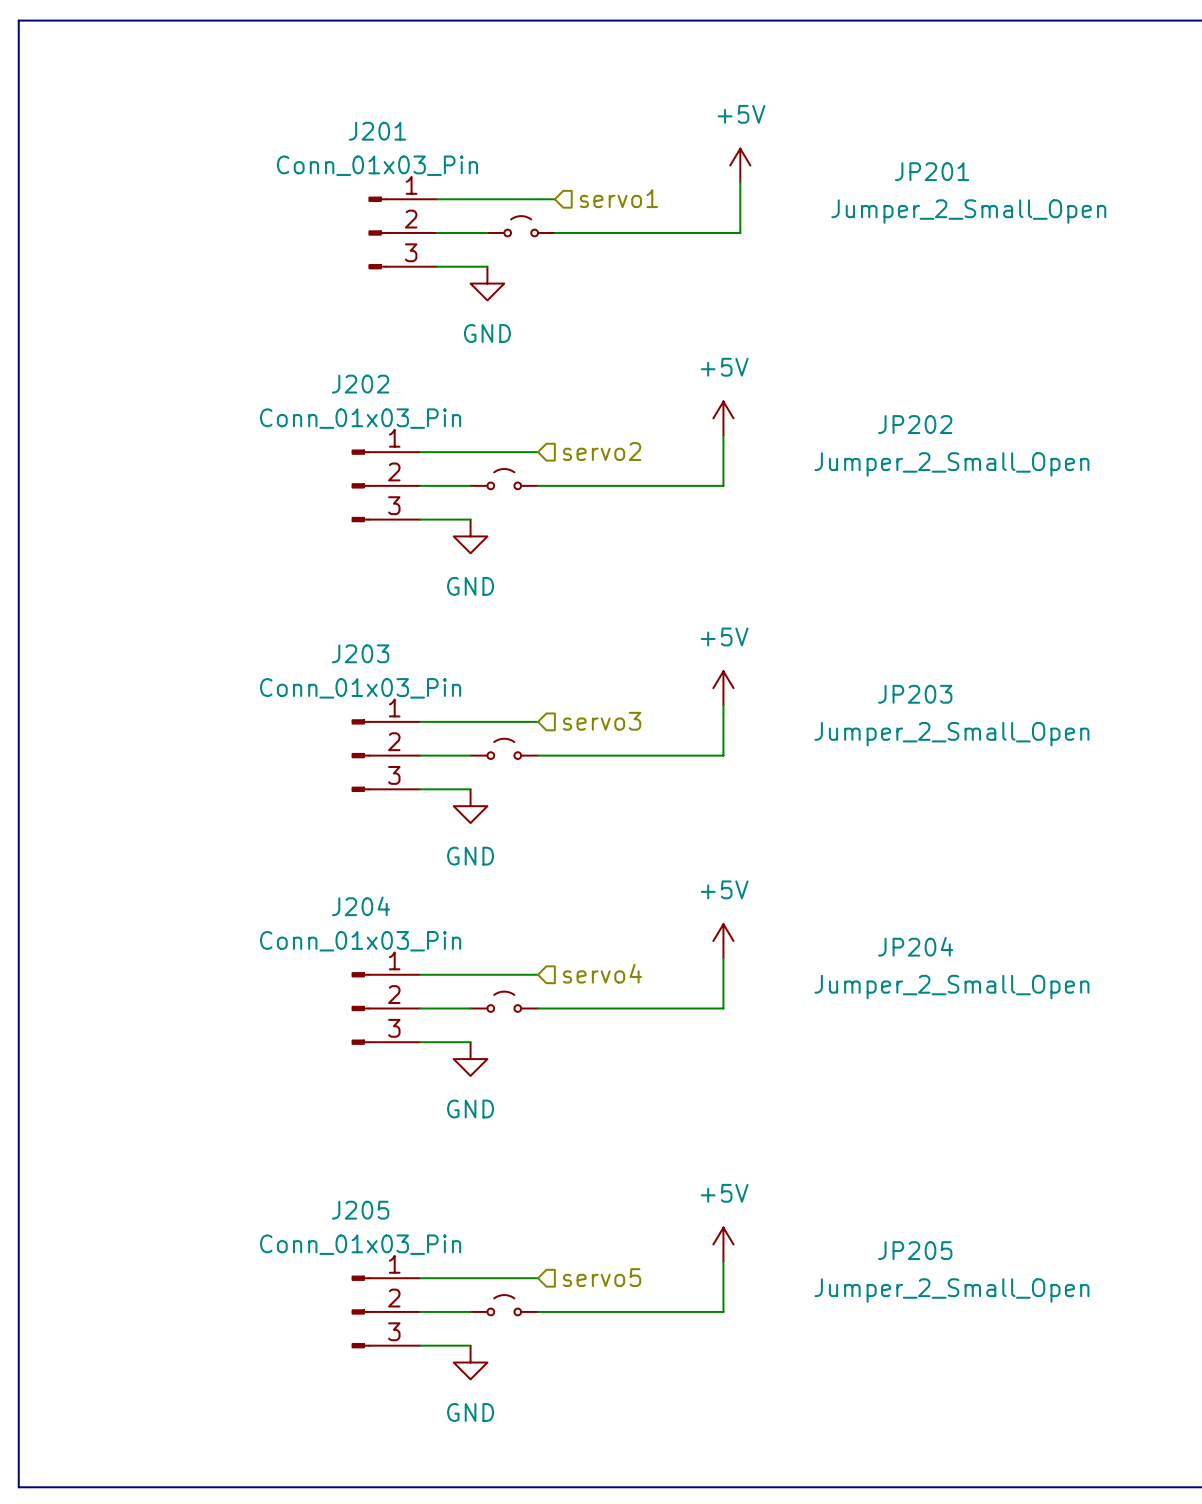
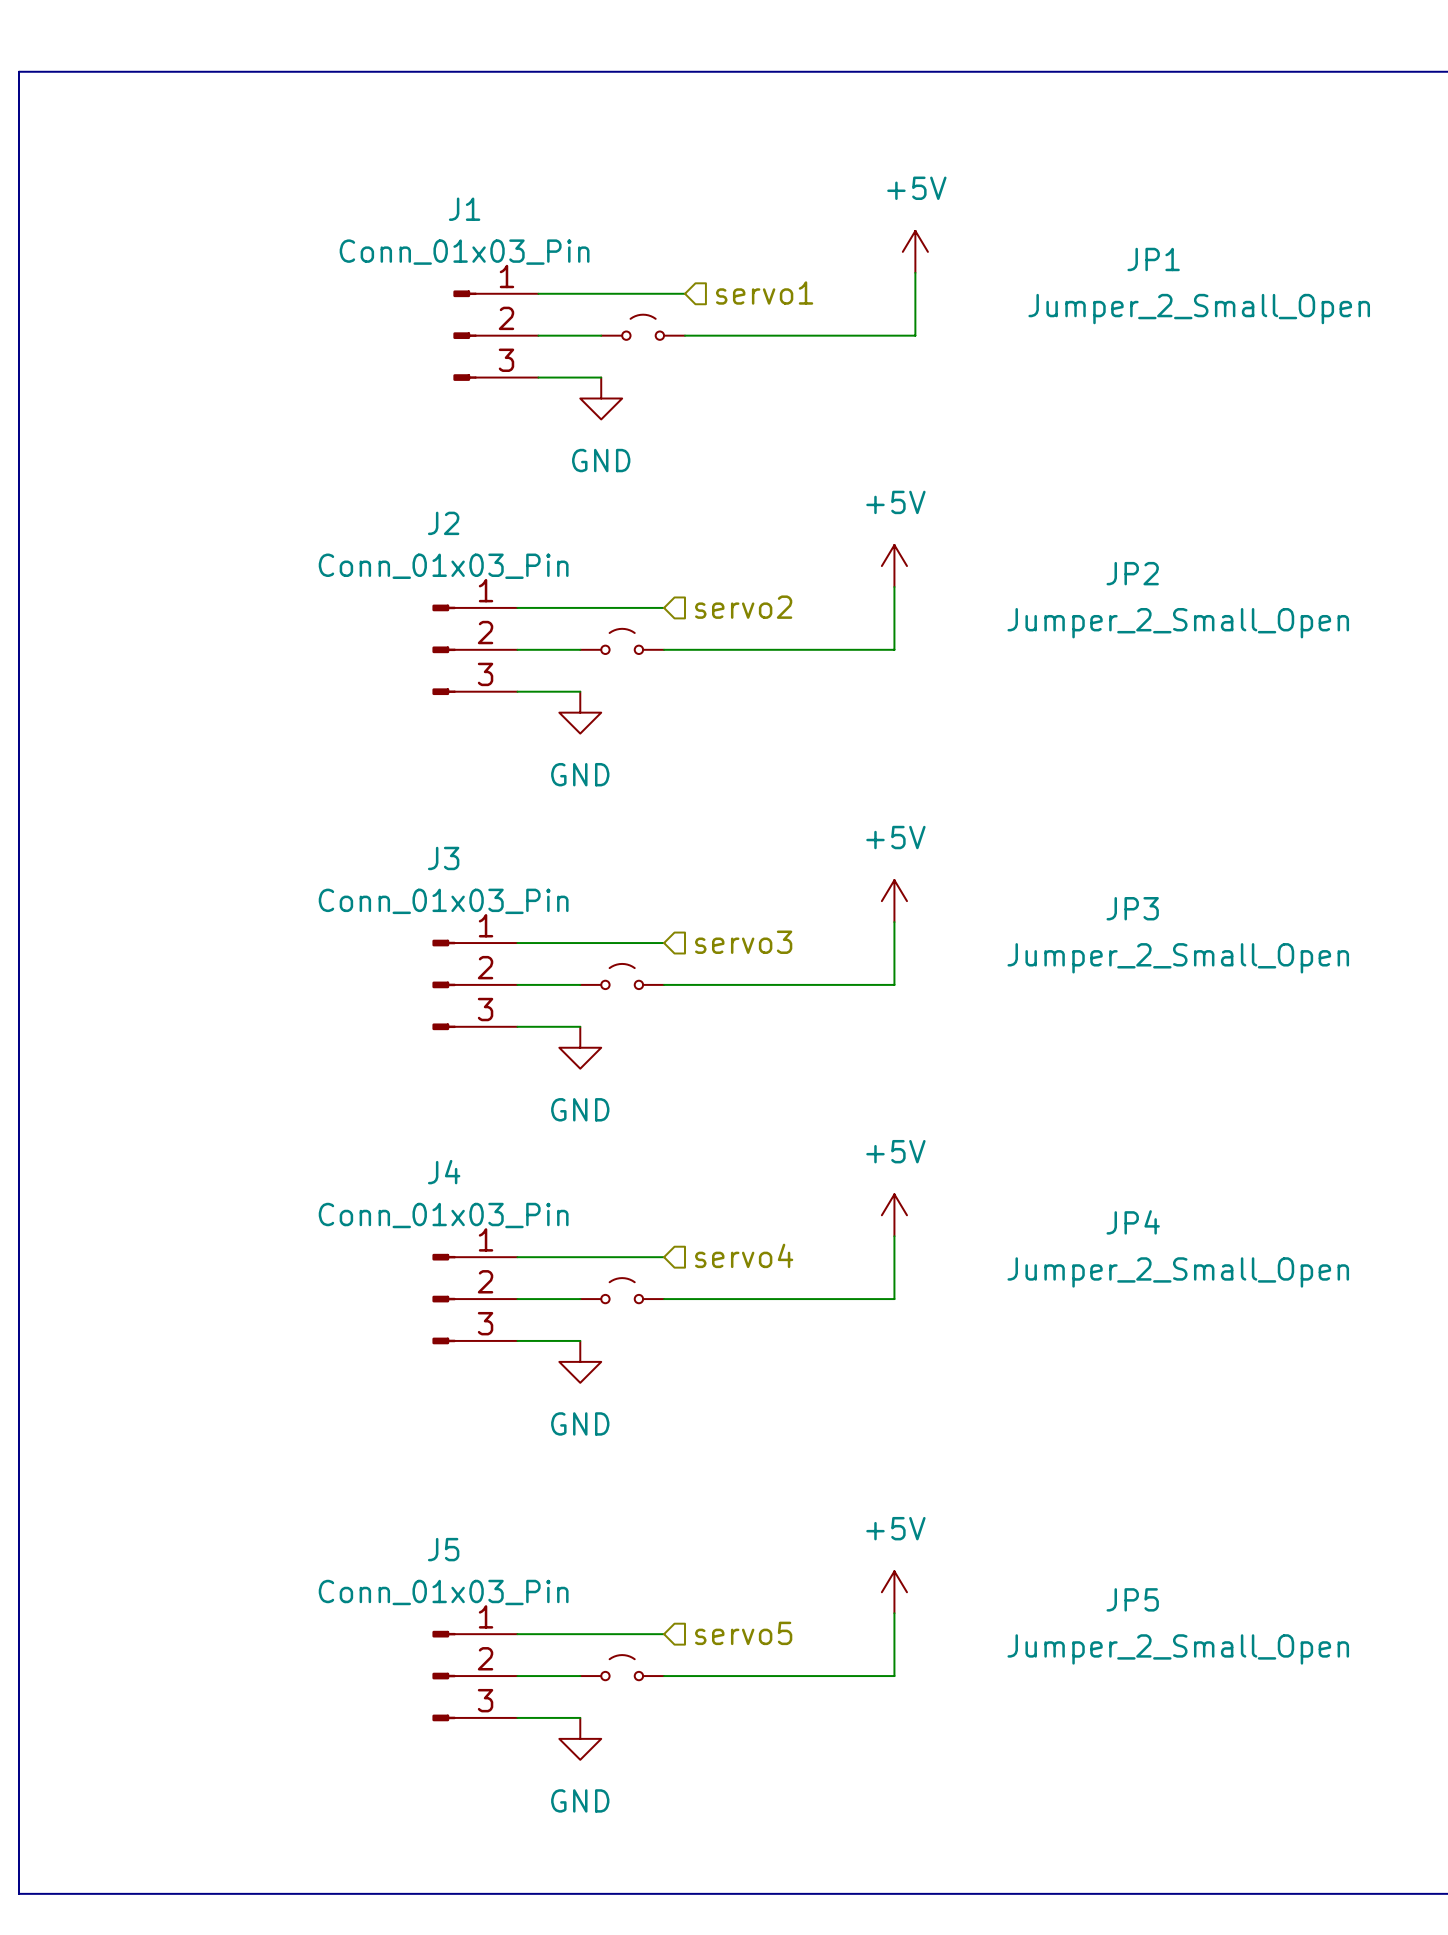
J201 name: J201 (377, 131) -> J1 (464, 209)
JP201 name: JP201 (932, 171) -> JP1 (1153, 259)
J202 name: J202 (360, 384) -> J2 (443, 523)
JP202 name: JP202 (915, 424) -> JP2 (1132, 573)
J203 name: J203 (360, 653) -> J3 (443, 858)
JP203 name: JP203 (915, 694) -> JP3 (1132, 908)
J204 name: J204 (360, 906) -> J4 (444, 1172)
JP204 name: JP204 (915, 946) -> JP4 (1133, 1222)
J205 name: J205 (360, 1210) -> J5 (443, 1549)
JP205 name: JP205 (915, 1250) -> JP5 (1132, 1599)

